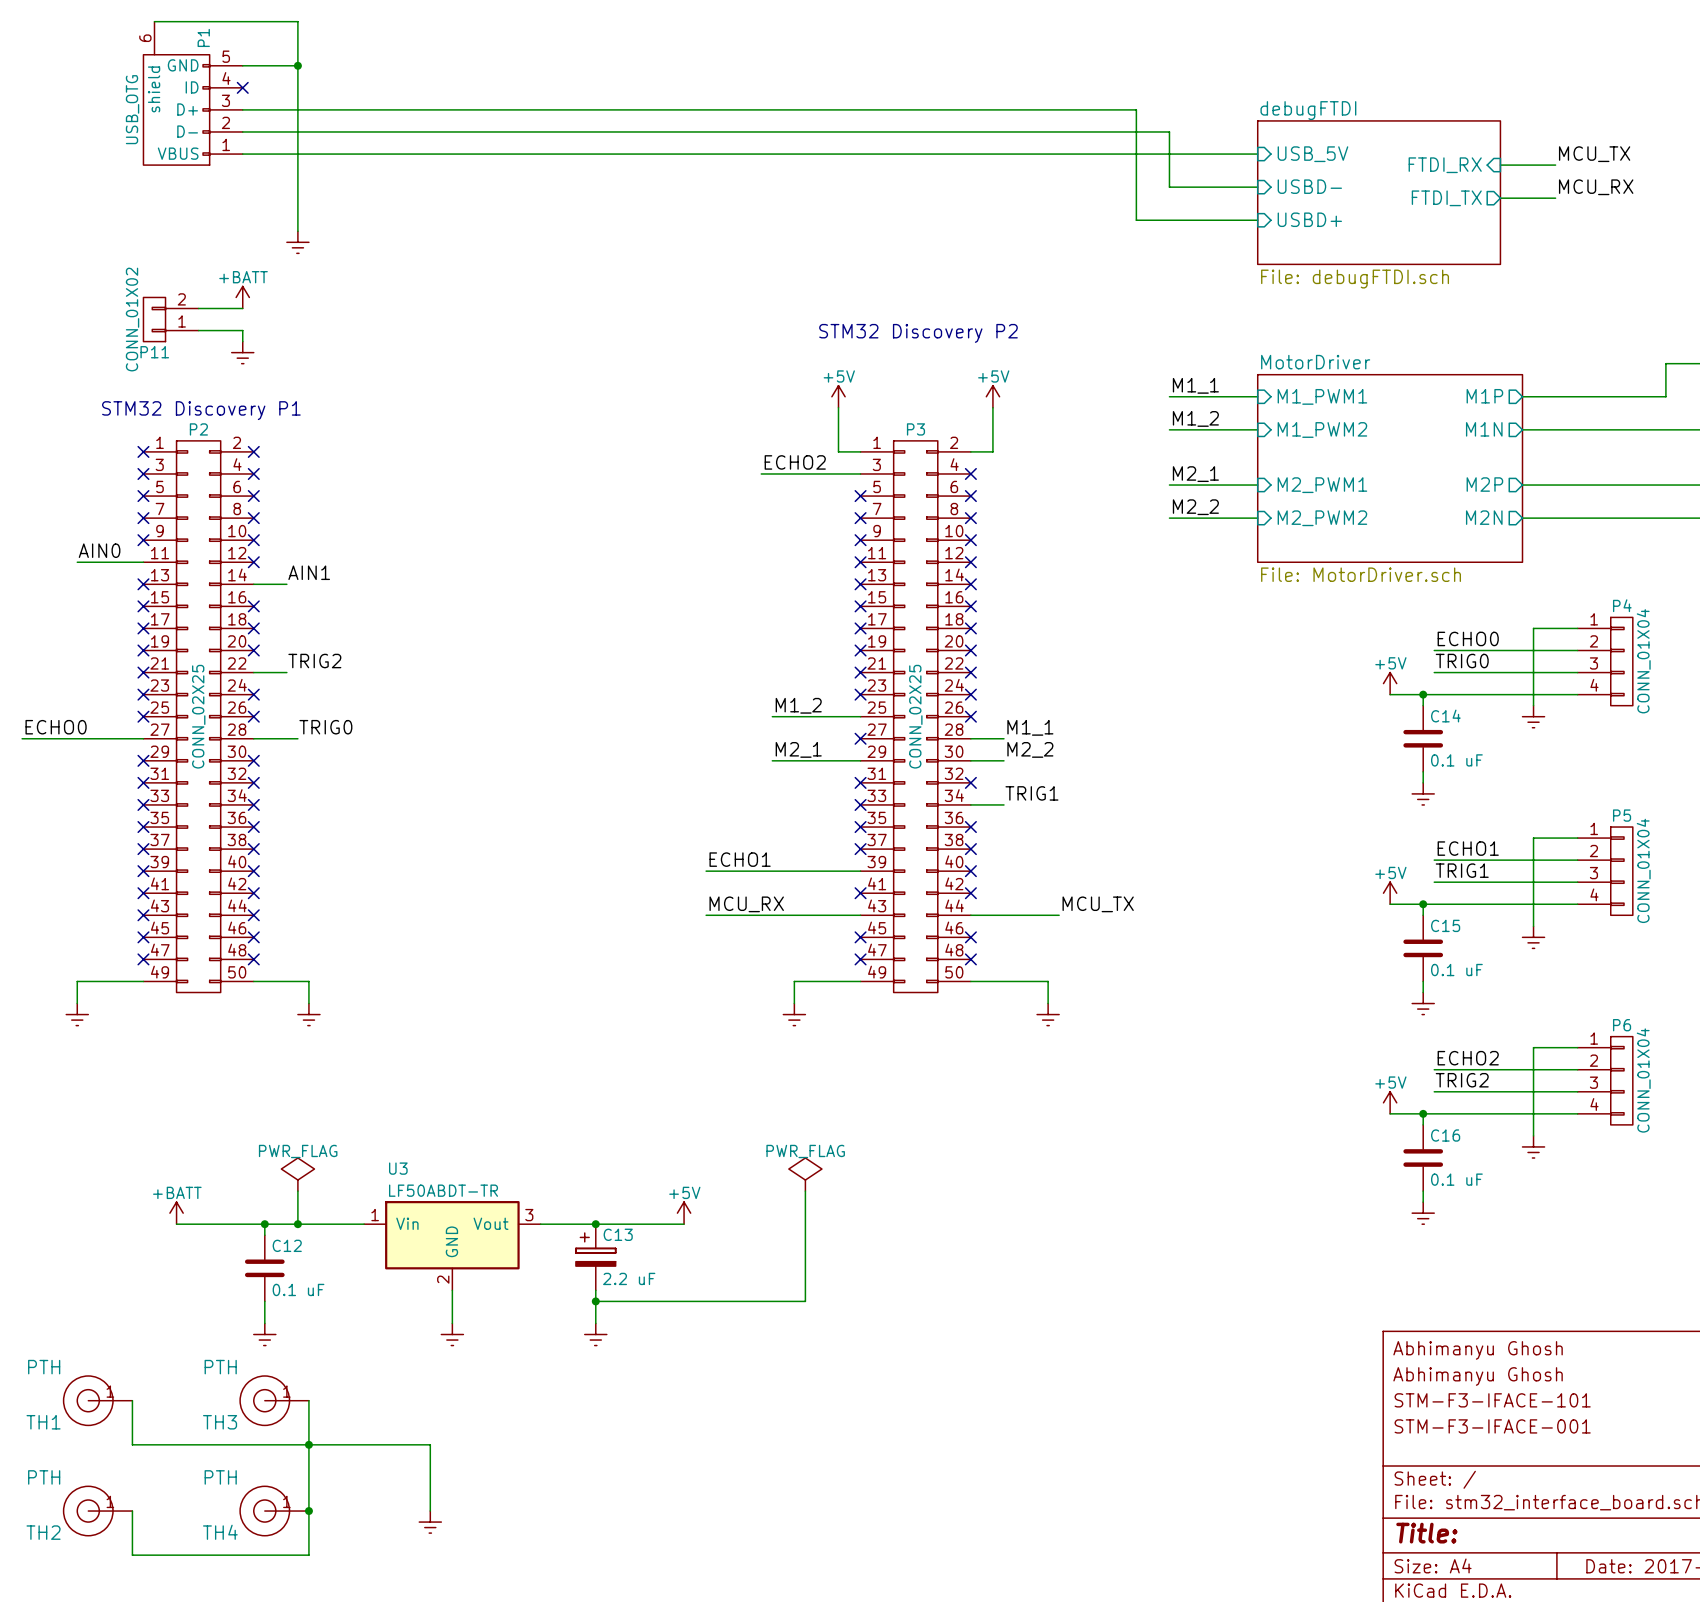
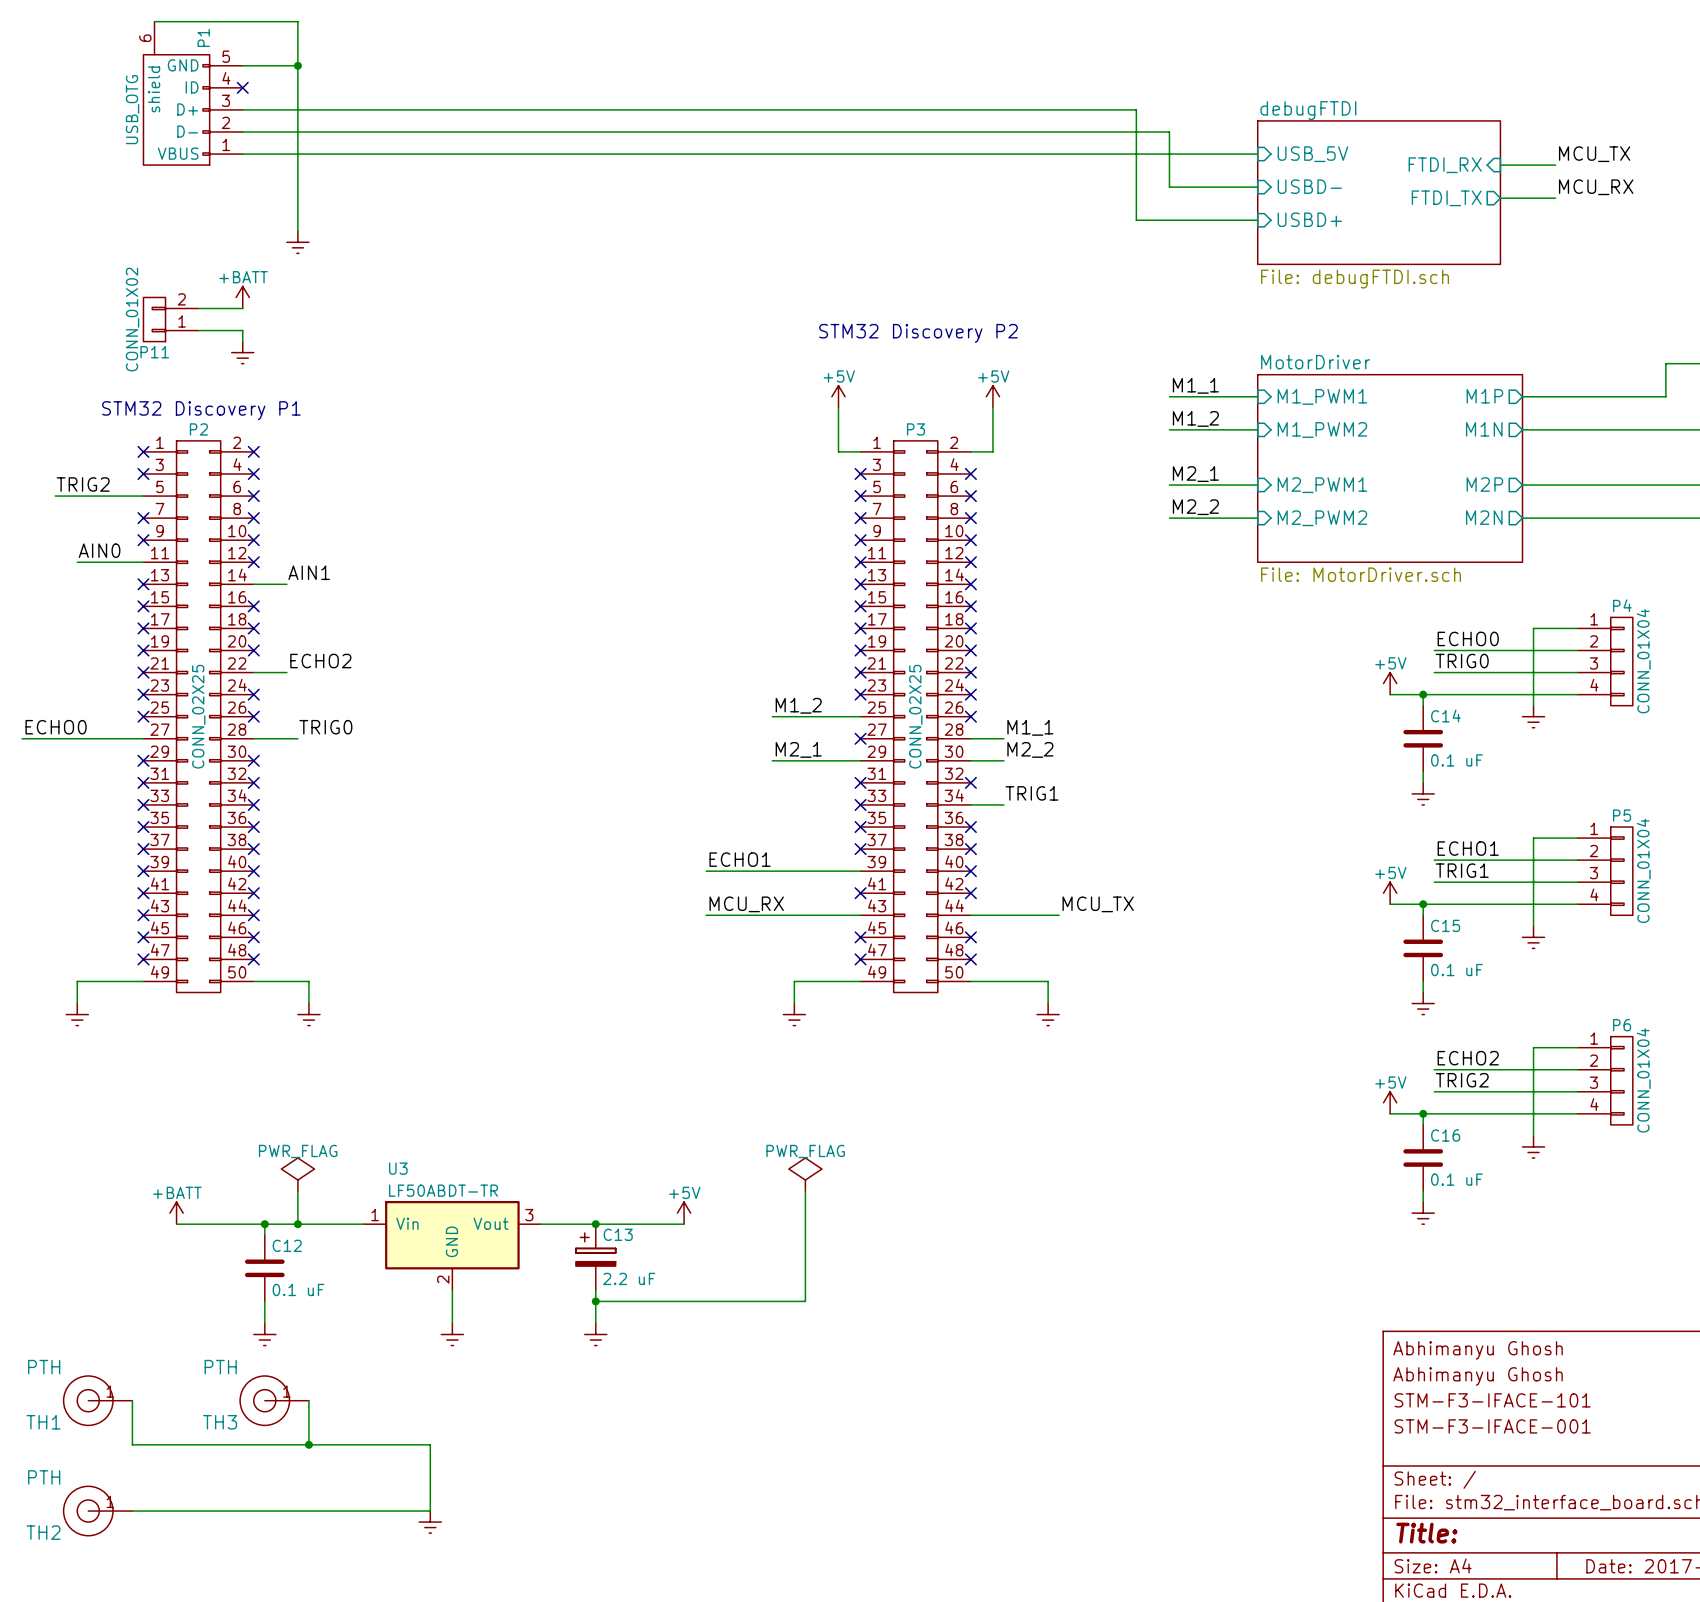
label: ECHO2 (795, 462) -> none
wire: (761, 473) (860, 473) -> none
no-connect mark: none -> (860, 473)
label: none -> TRIG2 (83, 484)
wire: none -> (55, 496) (143, 496)
no-connect mark: (143, 496) -> none
label: TRIG2 (314, 661) -> ECHO2 (320, 661)
wire: (308, 1444) (308, 1555) (132, 1555) (132, 1511) -> (430, 1511) (132, 1511)
TH4: PTH (274, 1511) -> none
junction: (308, 1511) -> none

